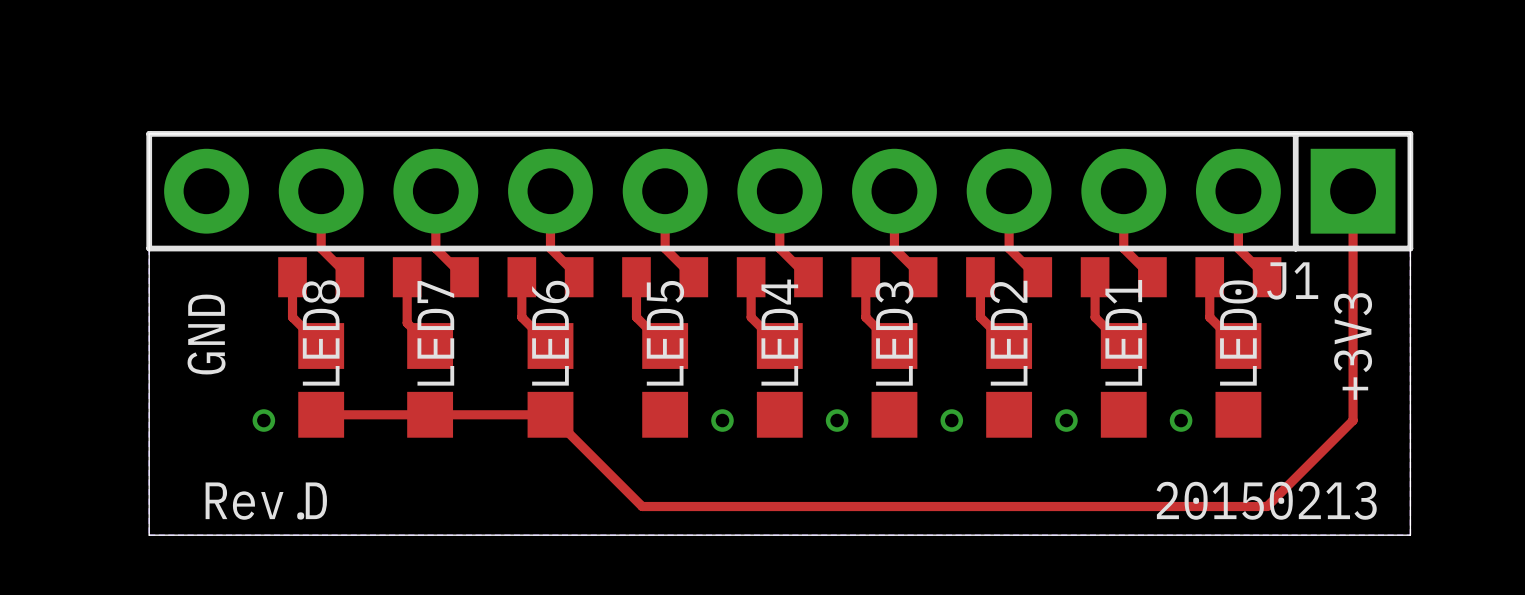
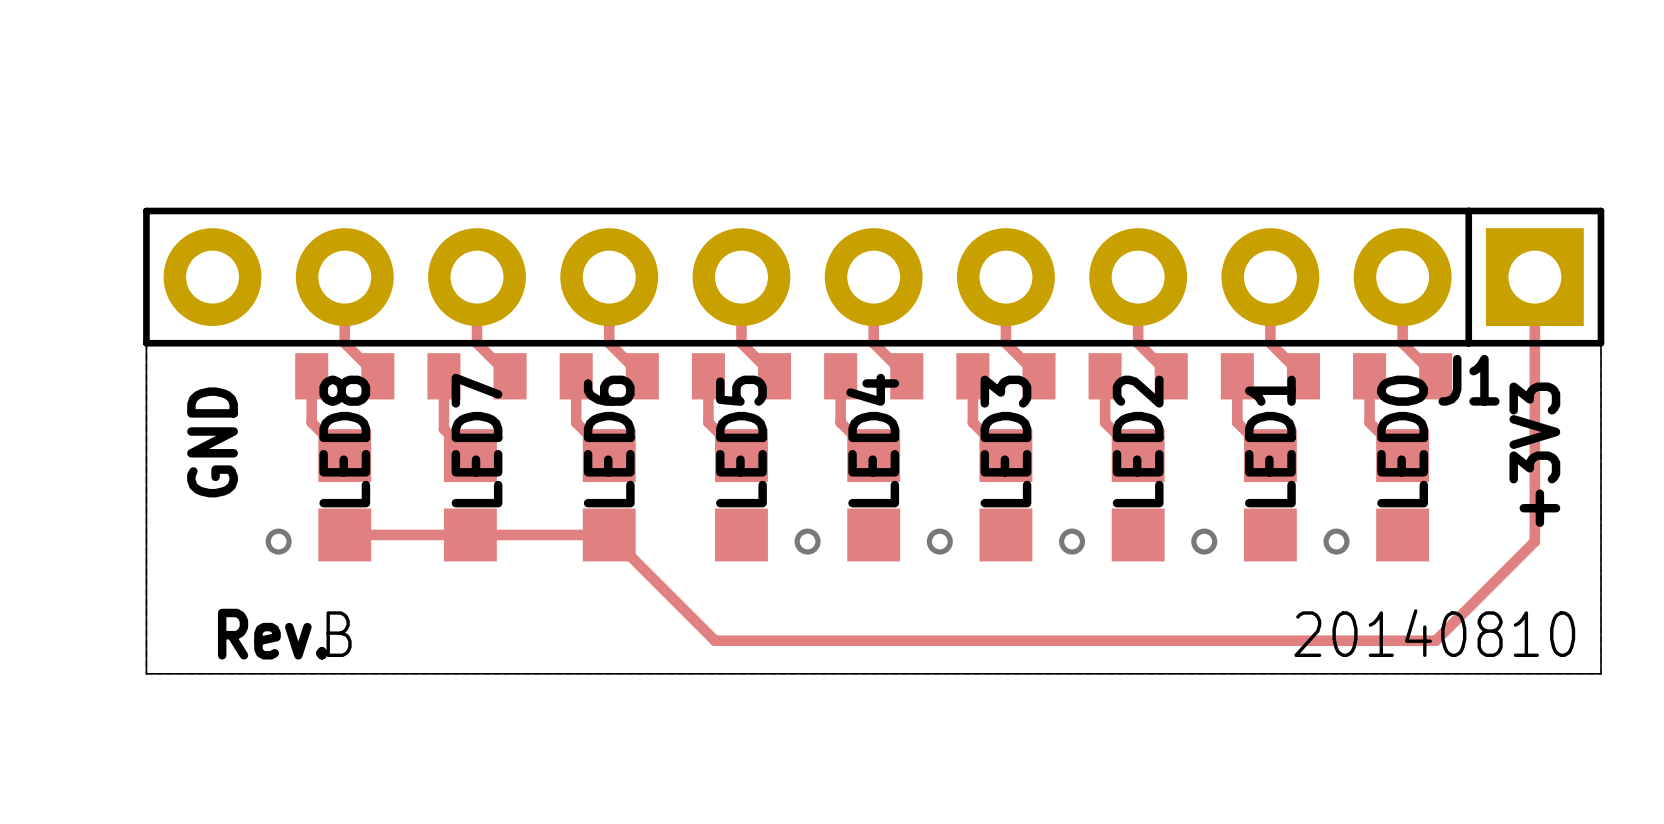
text: D (316, 500) -> B (339, 634)
text: 20150213 (1266, 500) -> 20140810 (1434, 633)

